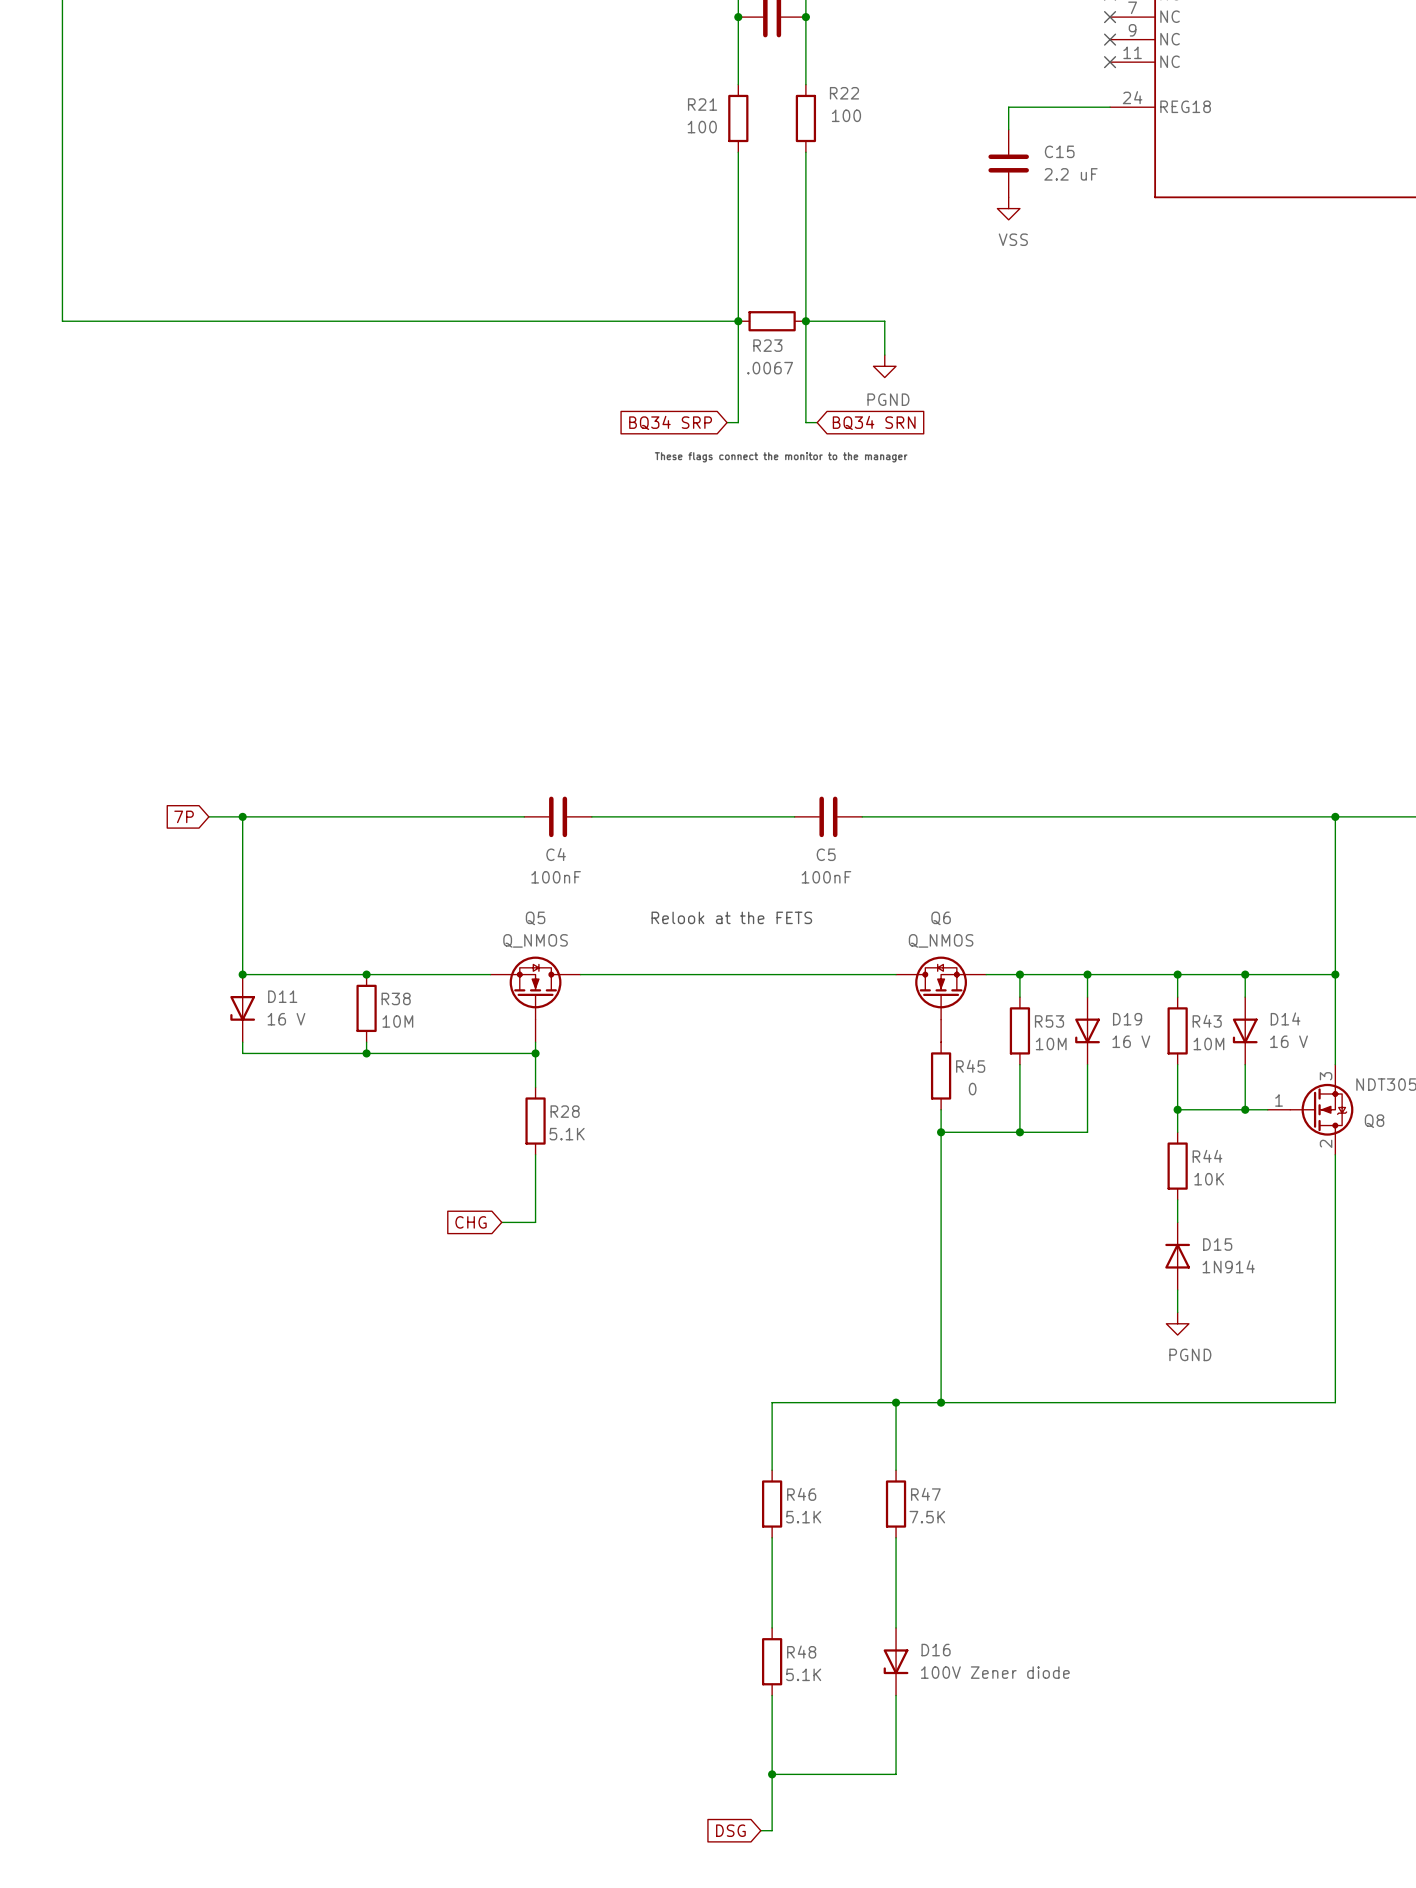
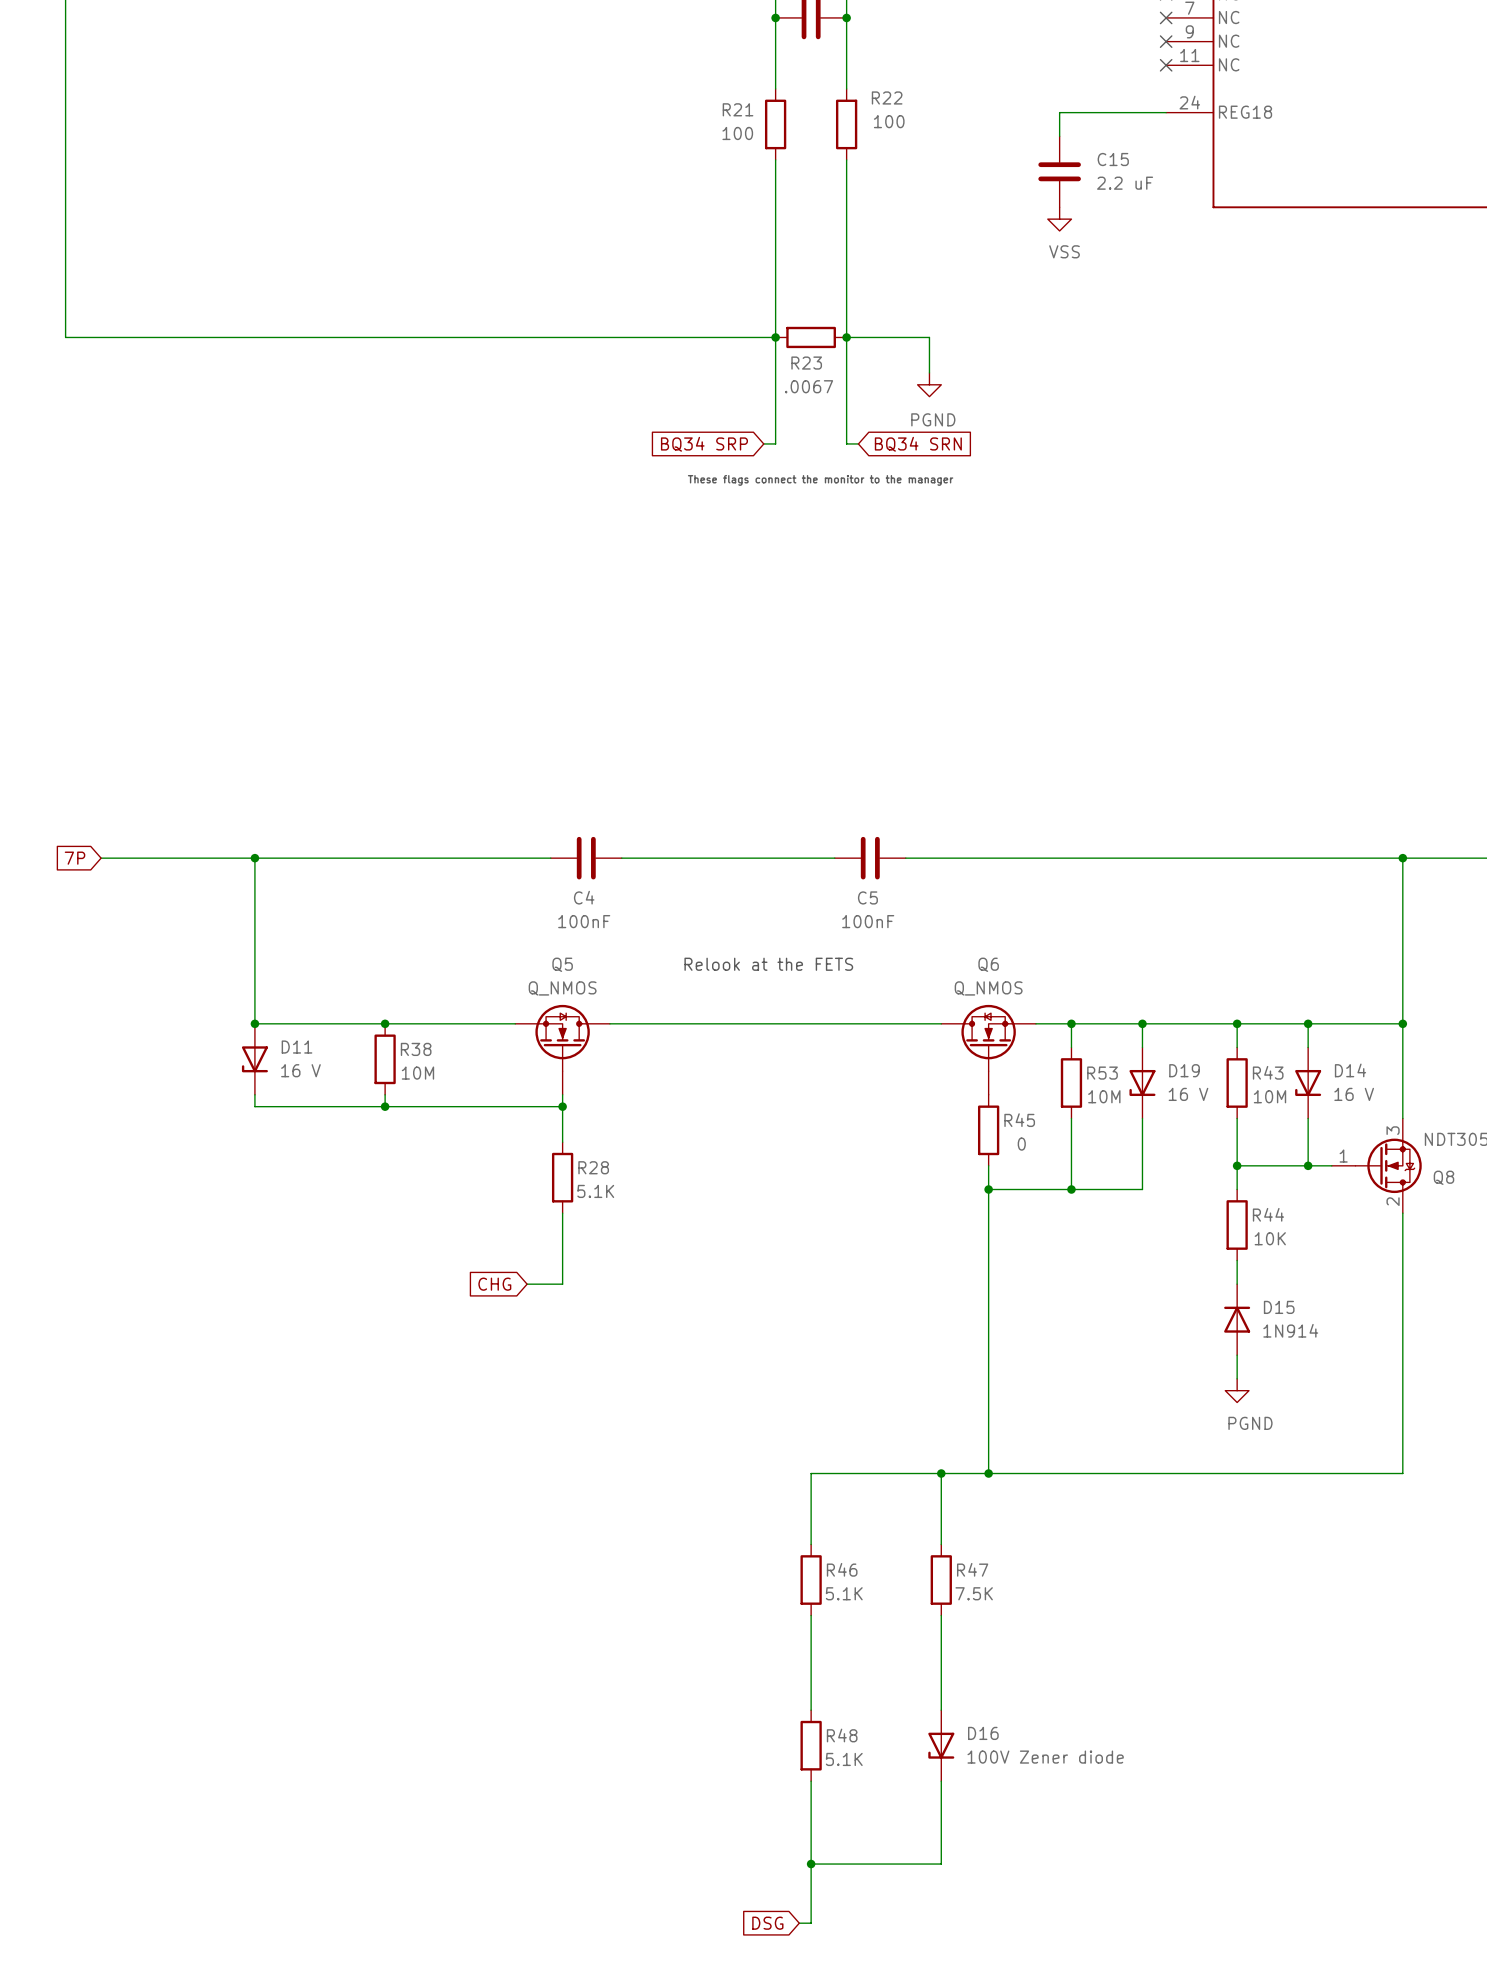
wire: none -> (101, 858) (219, 858)
global label position: 7P (184, 816) -> 7P (75, 858)

